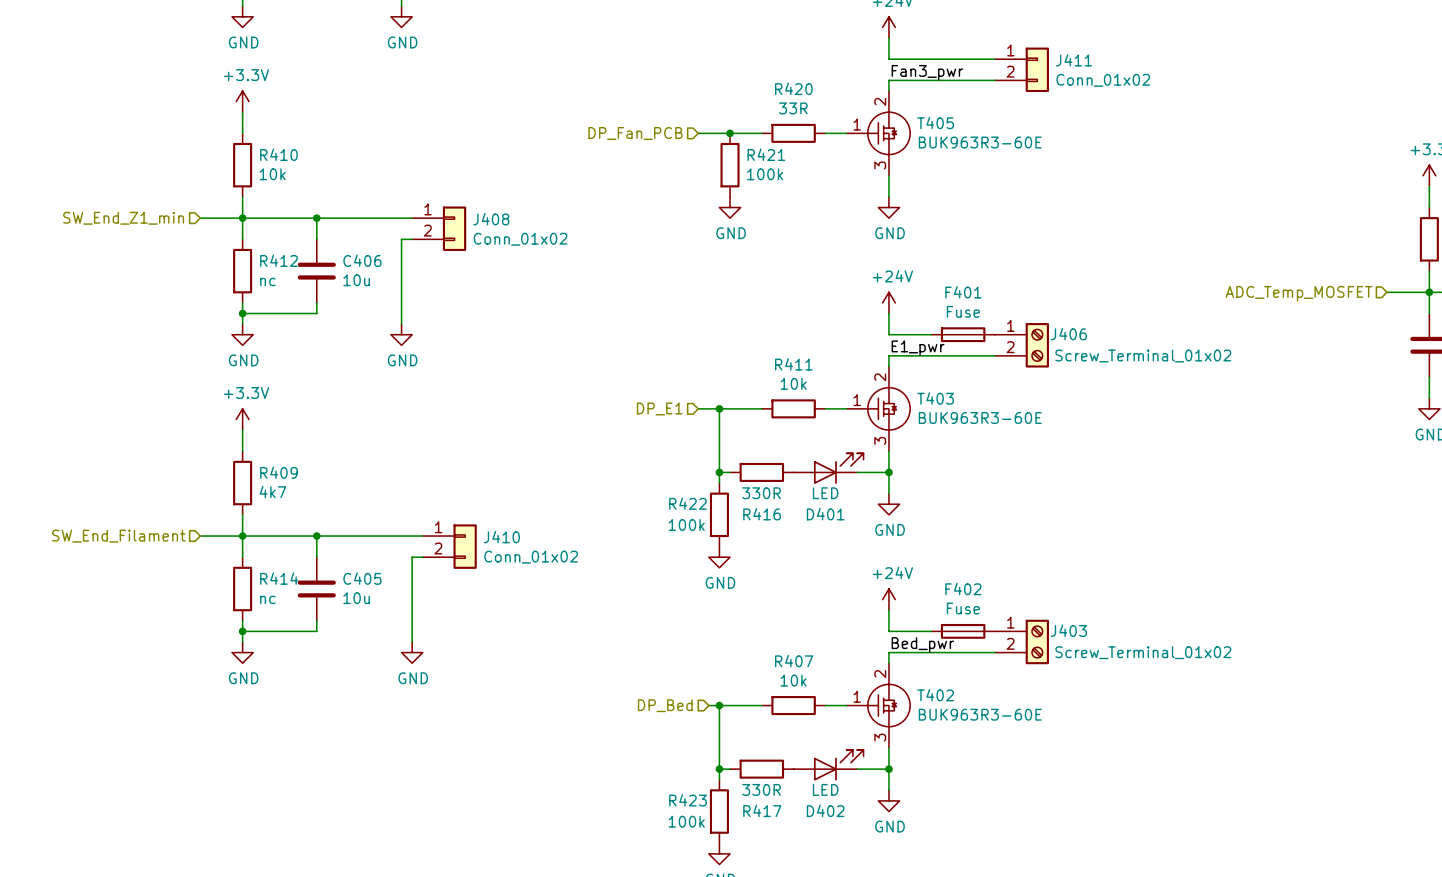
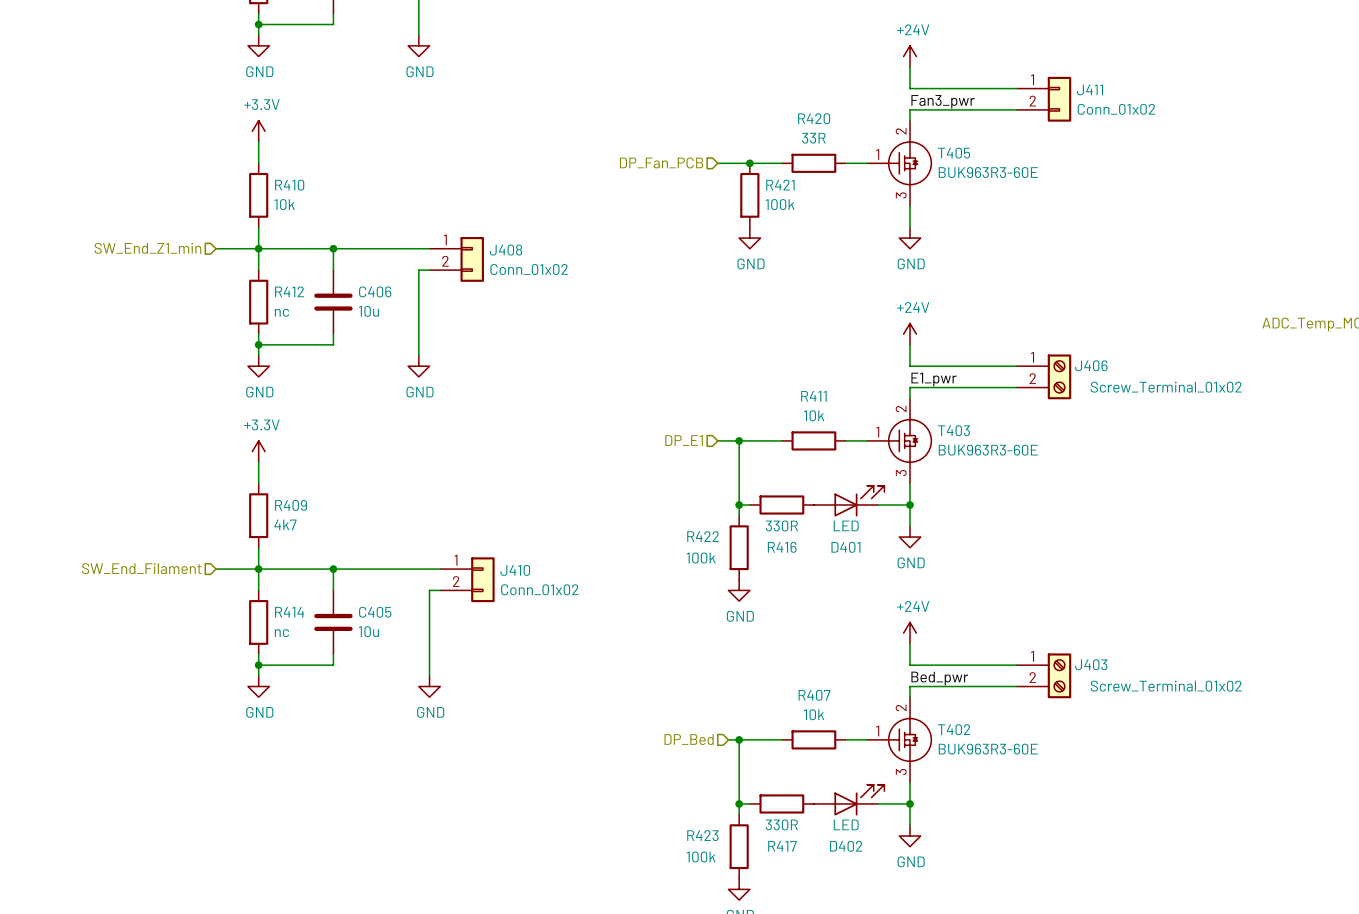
F401: Fuse (963, 334) -> none
F402: Fuse (963, 631) -> none

